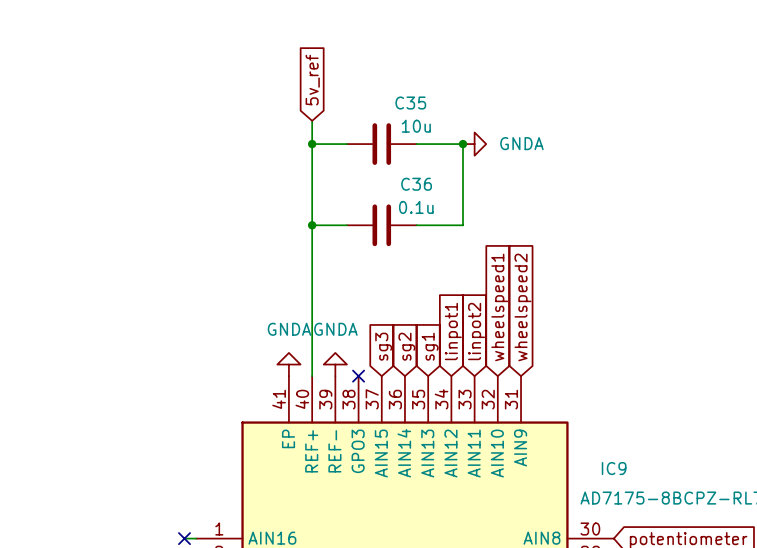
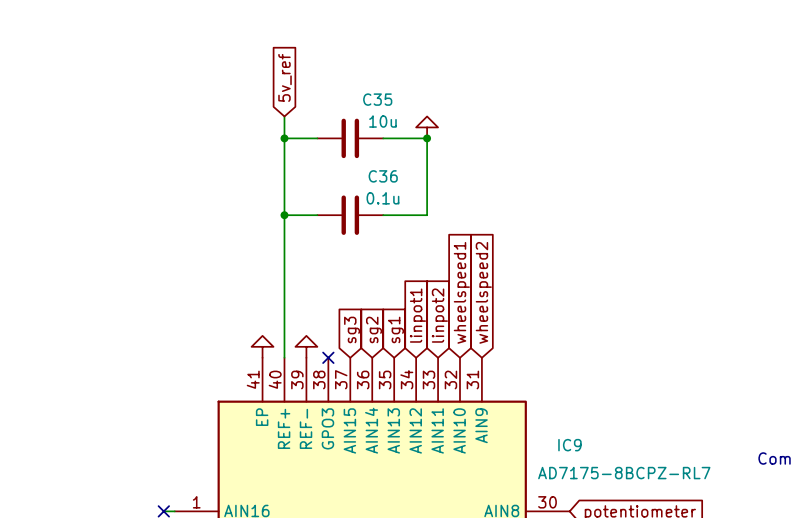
power symbol: none -> (427, 127)
power symbol: GNDA (474, 144) -> none
power symbol text: GNDA (289, 329) -> none
power symbol text: GNDA (335, 329) -> none

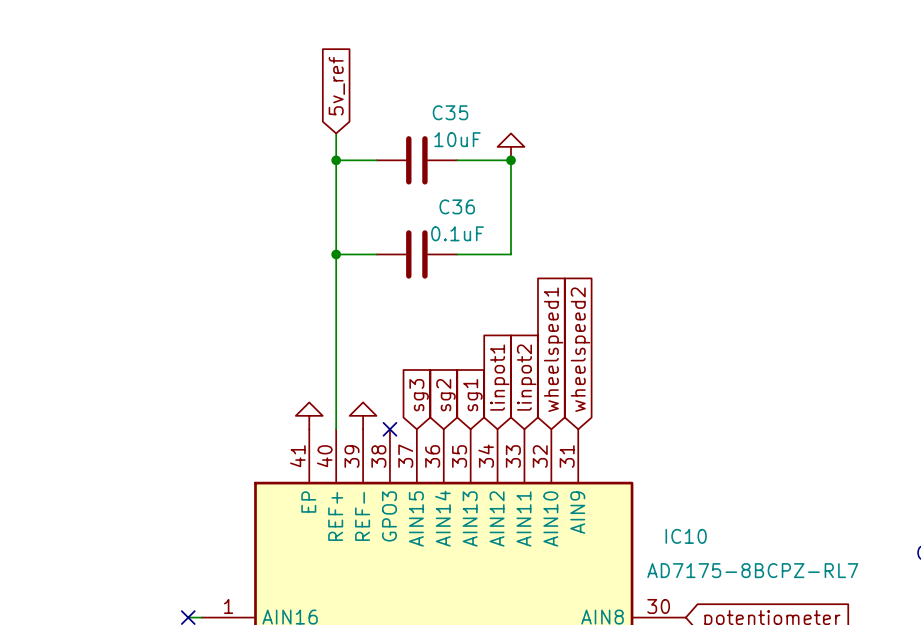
C35 value: 10u (382, 121) -> 10uF (457, 139)
C36 value: 0.1u (382, 198) -> 0.1uF (457, 233)
IC9 name: IC9 (569, 445) -> IC10 (686, 536)

